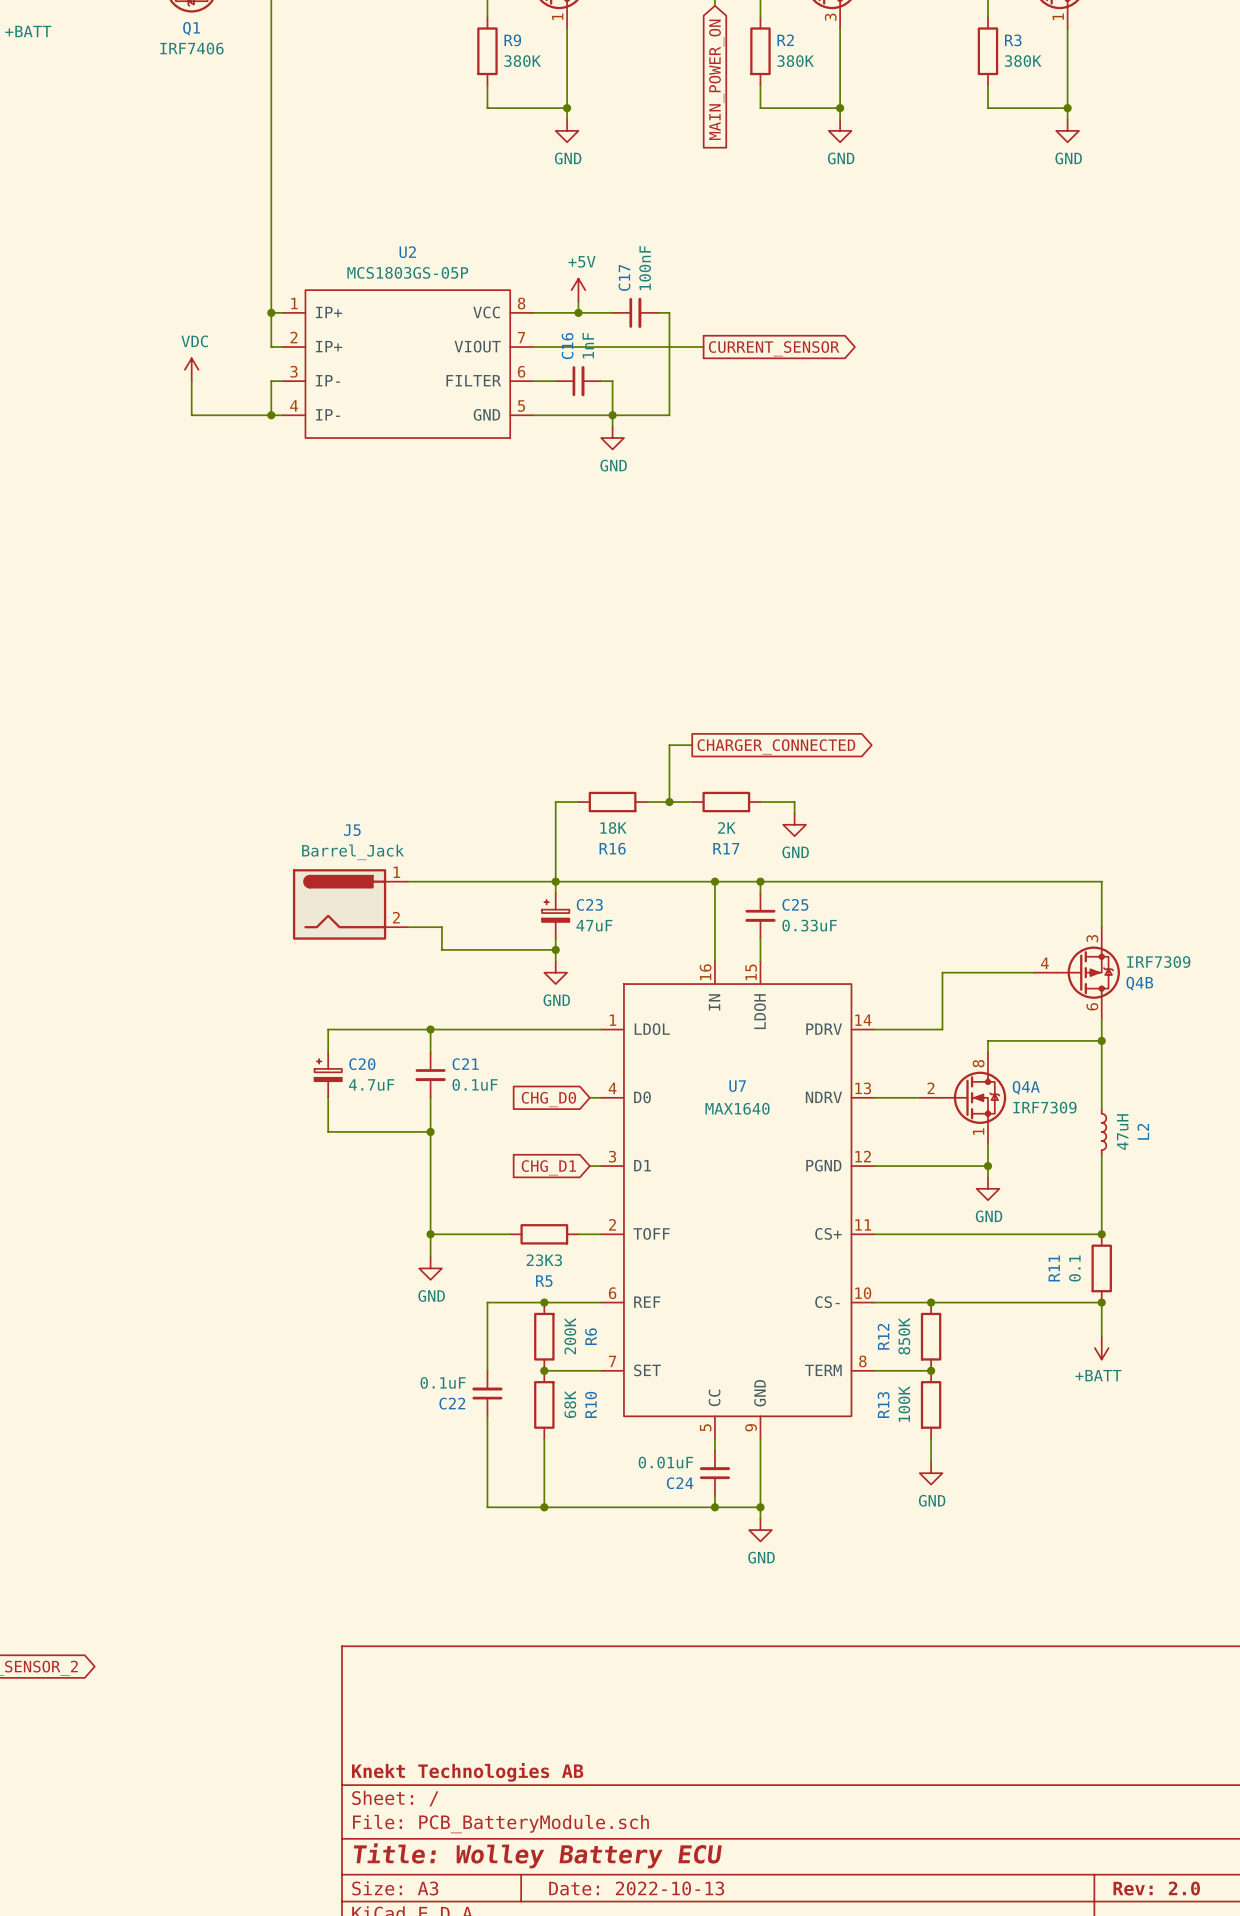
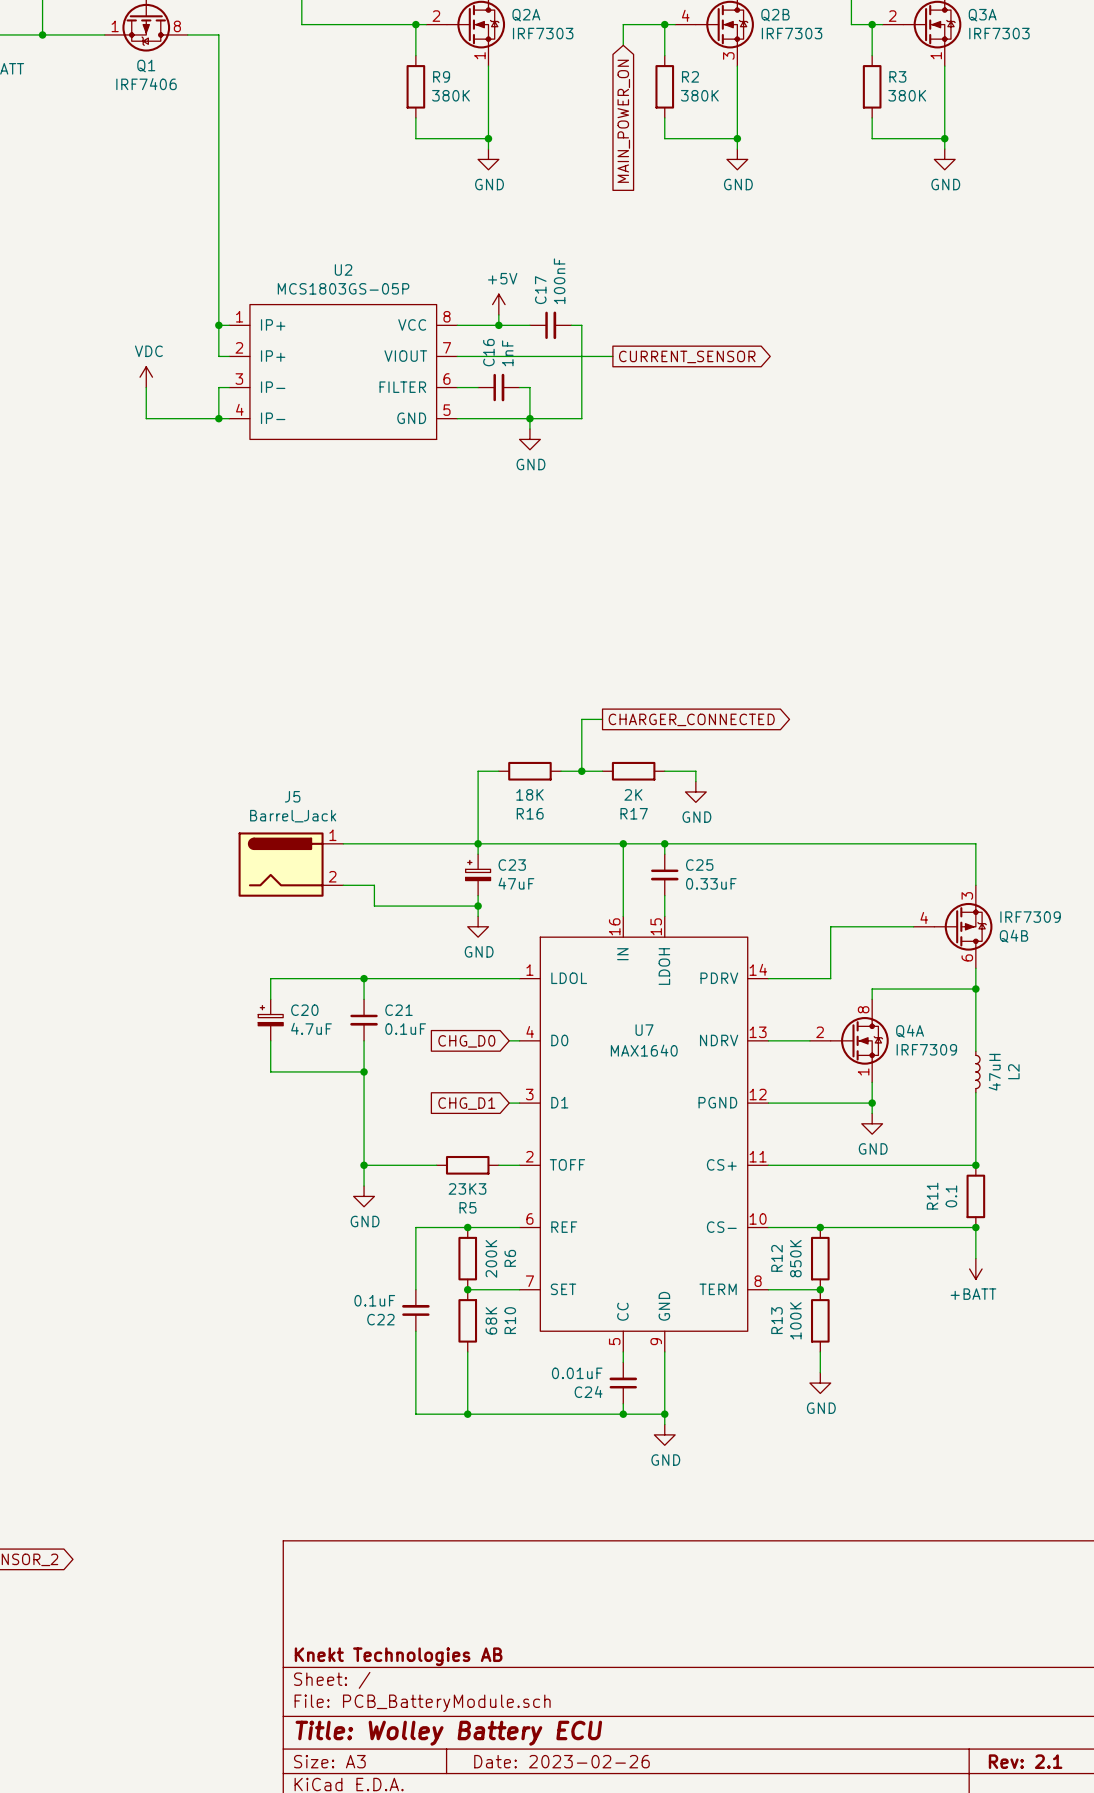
title block: Date: 2022-10-13 (636, 1888) -> Date: 2023-02-26 (562, 1761)
title block: Rev: 2.0 (1156, 1888) -> Rev: 2.1 (1025, 1761)

